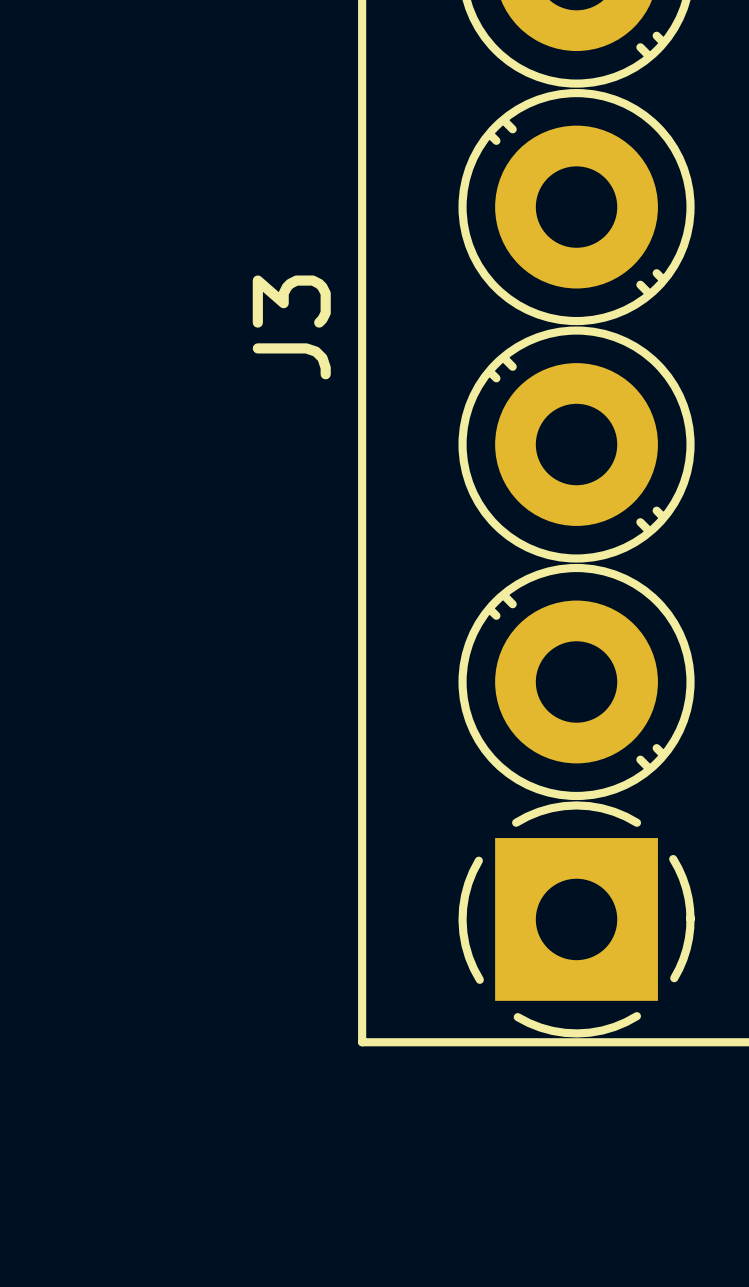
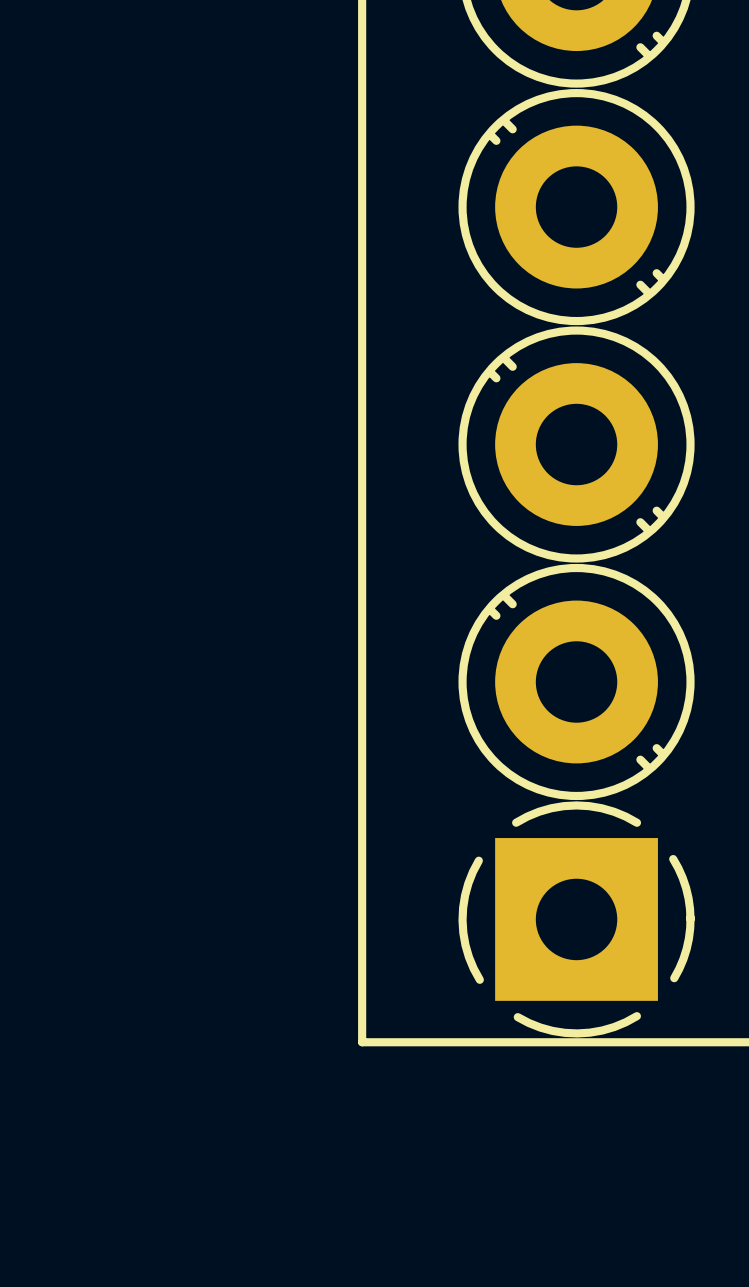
J3 name: J3 (291, 327) -> none

